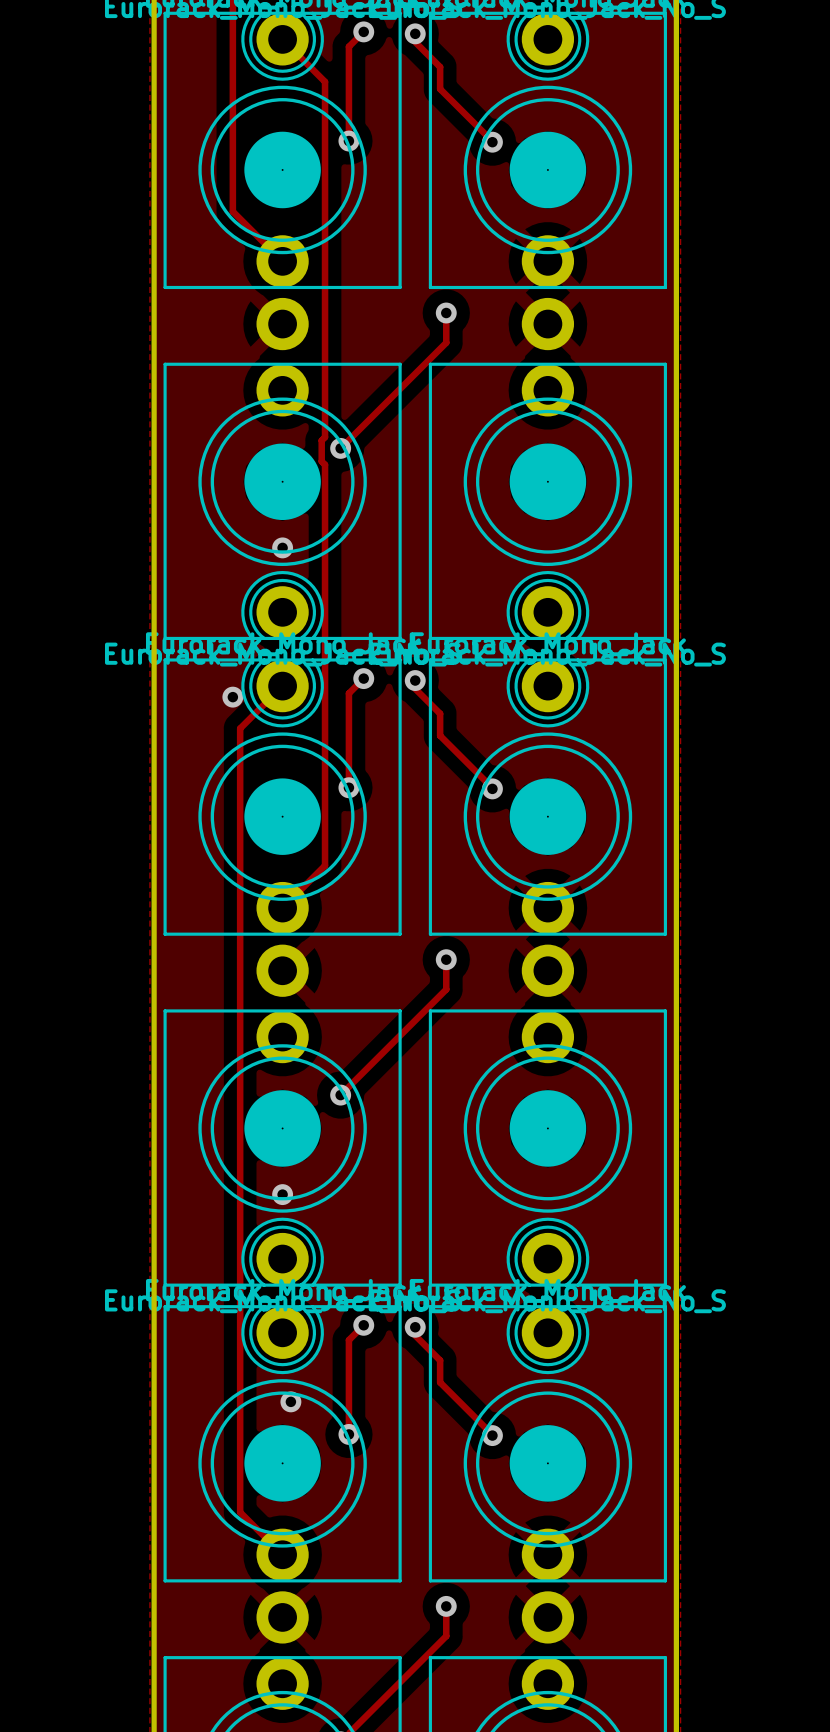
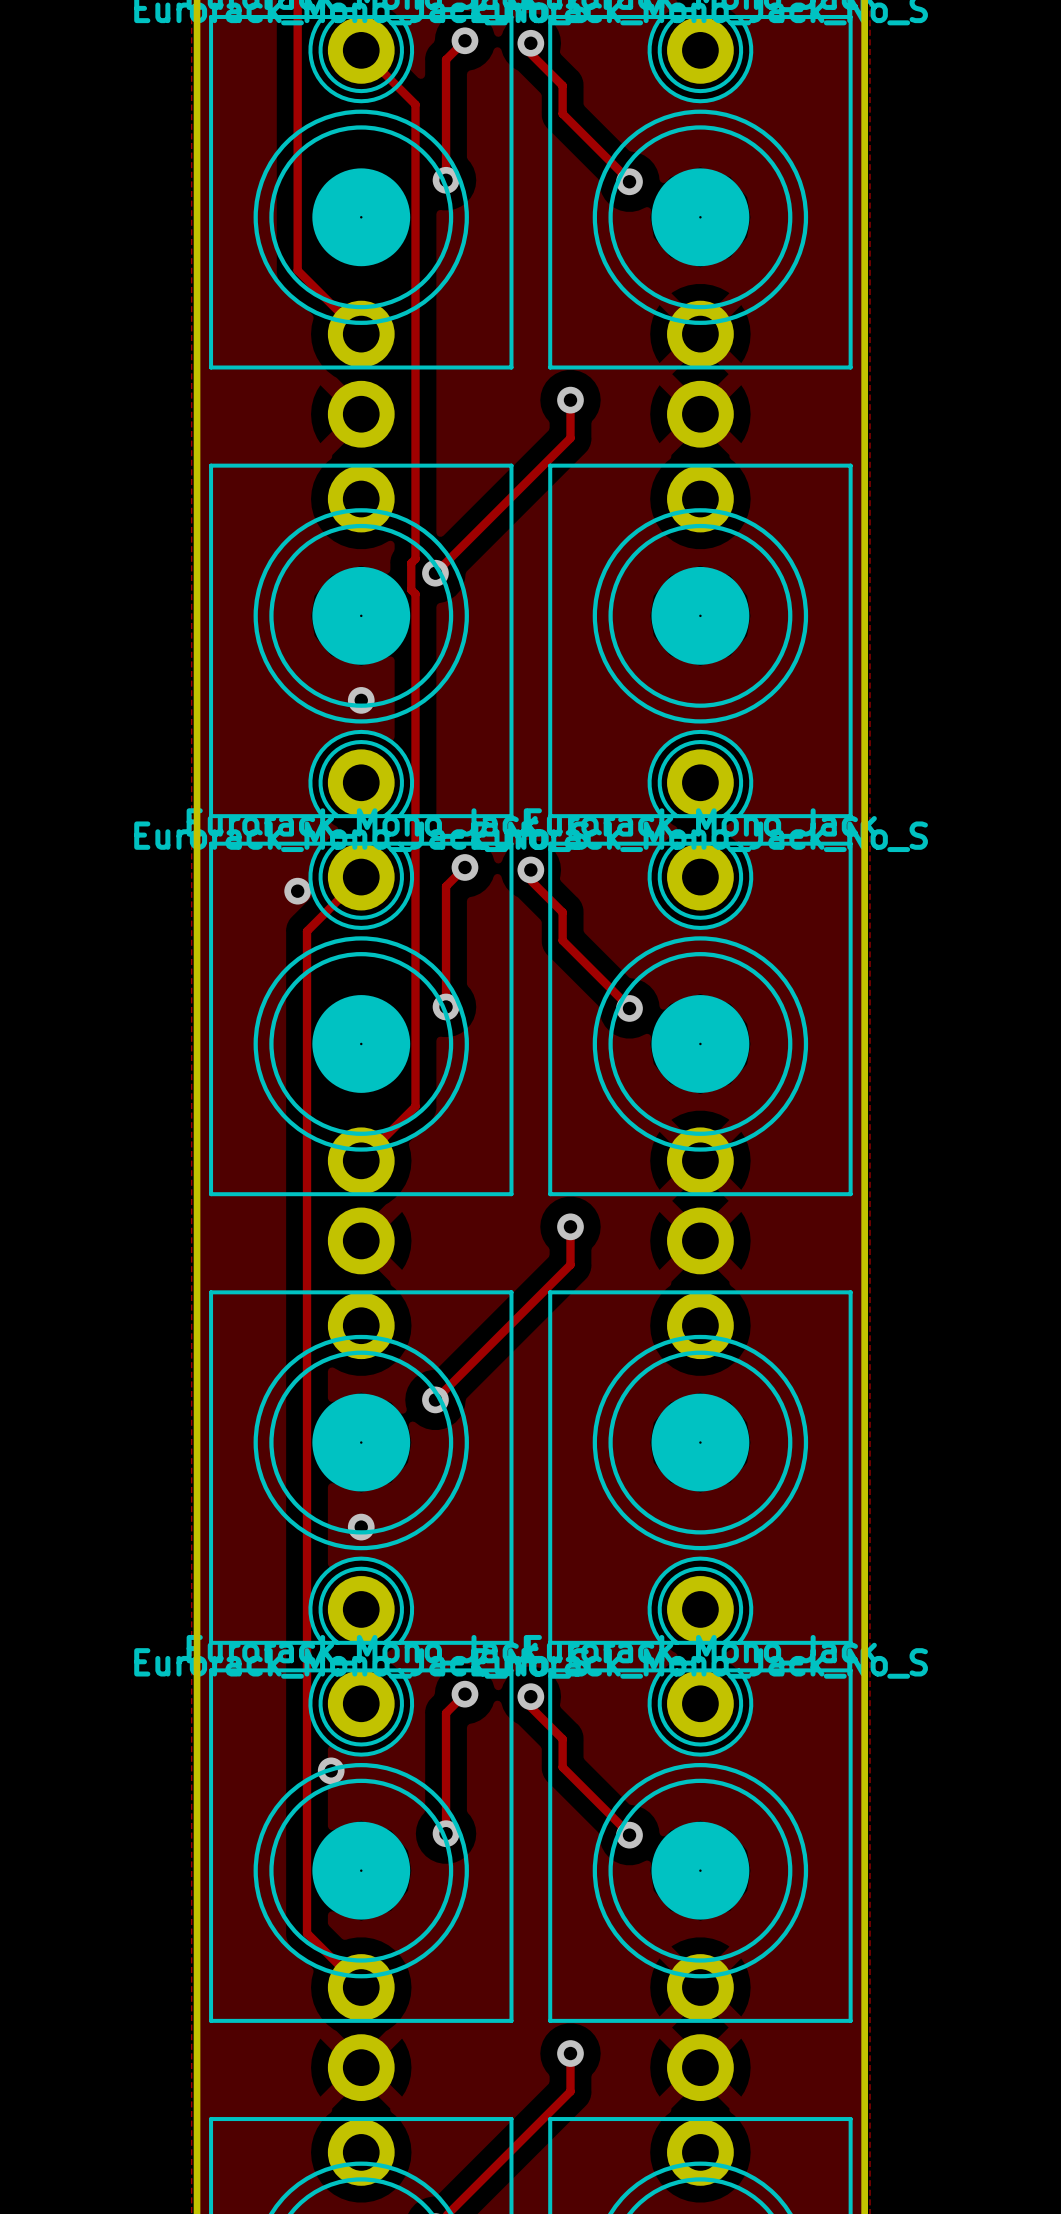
via position: (290, 1401) -> (331, 1770)

